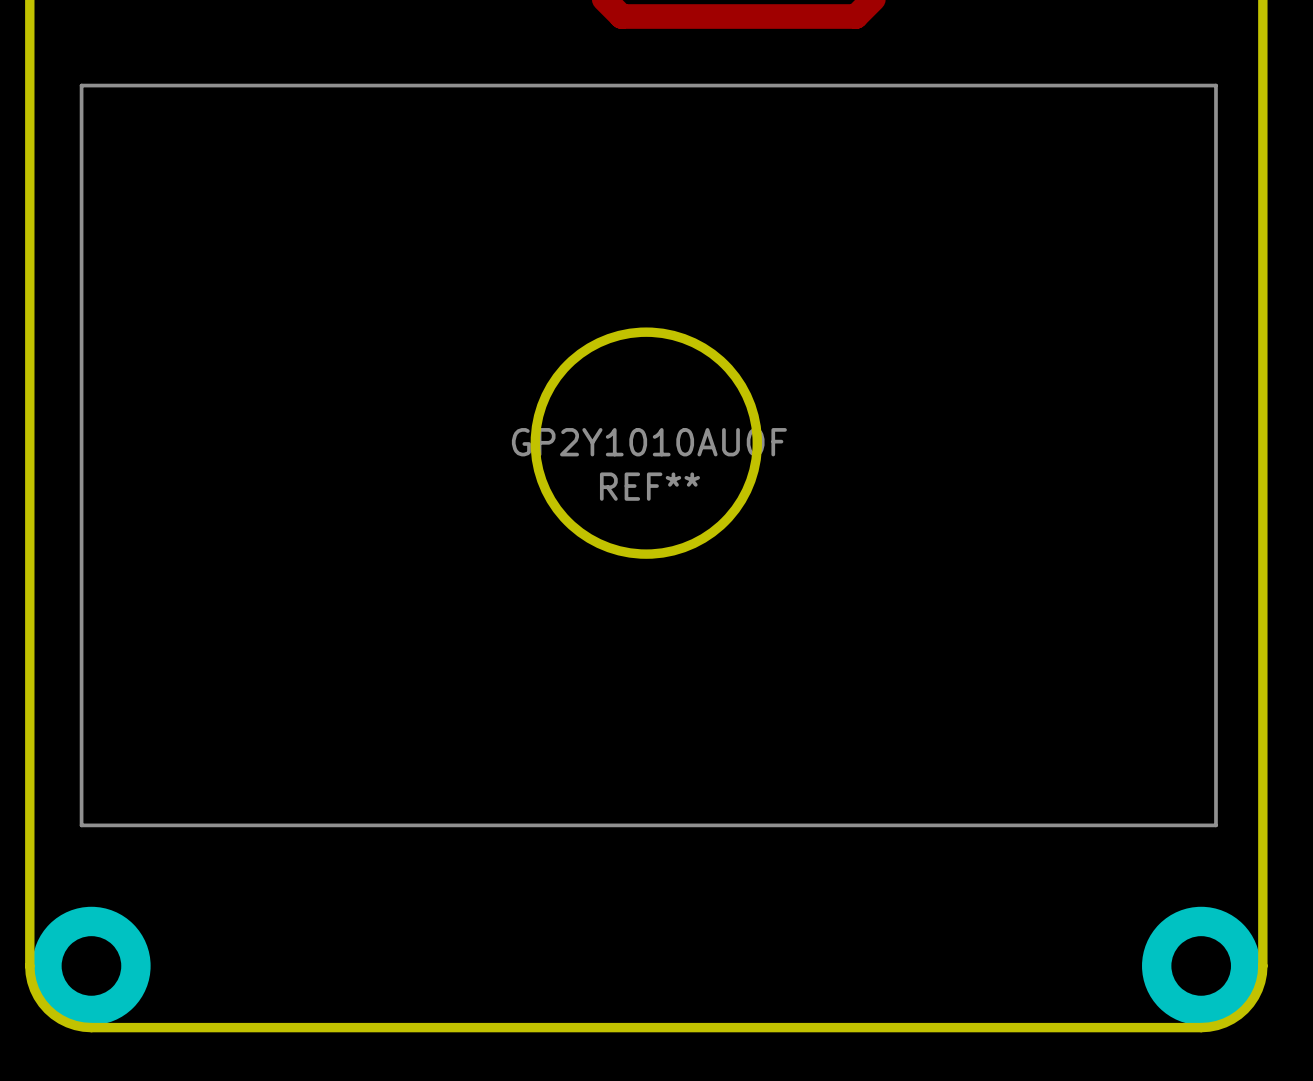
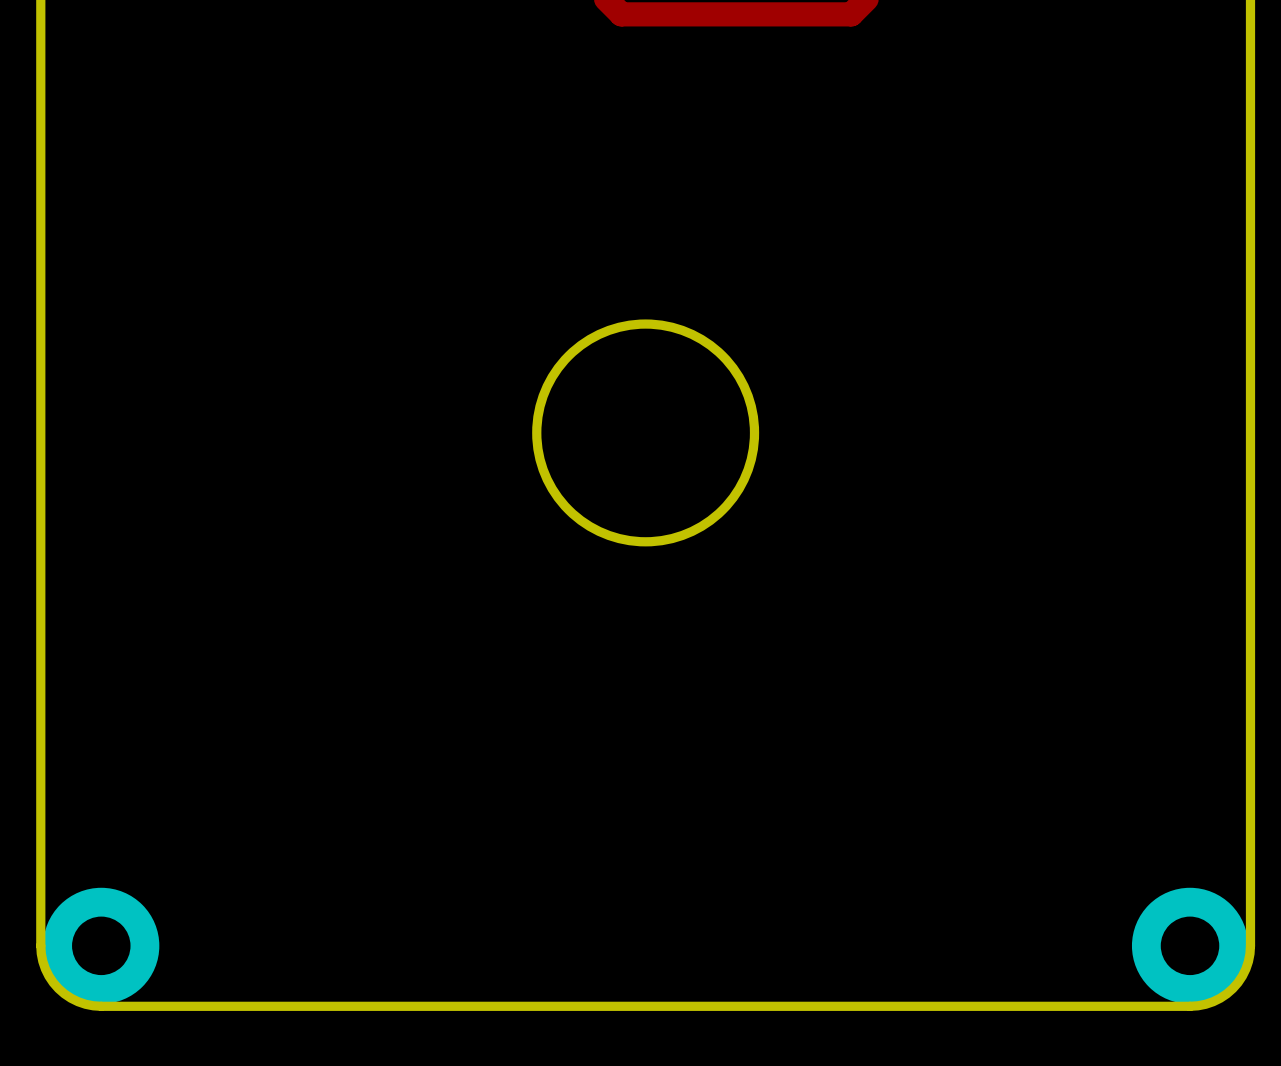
REF**: GP2Y1010AU0F (648, 455) -> none

